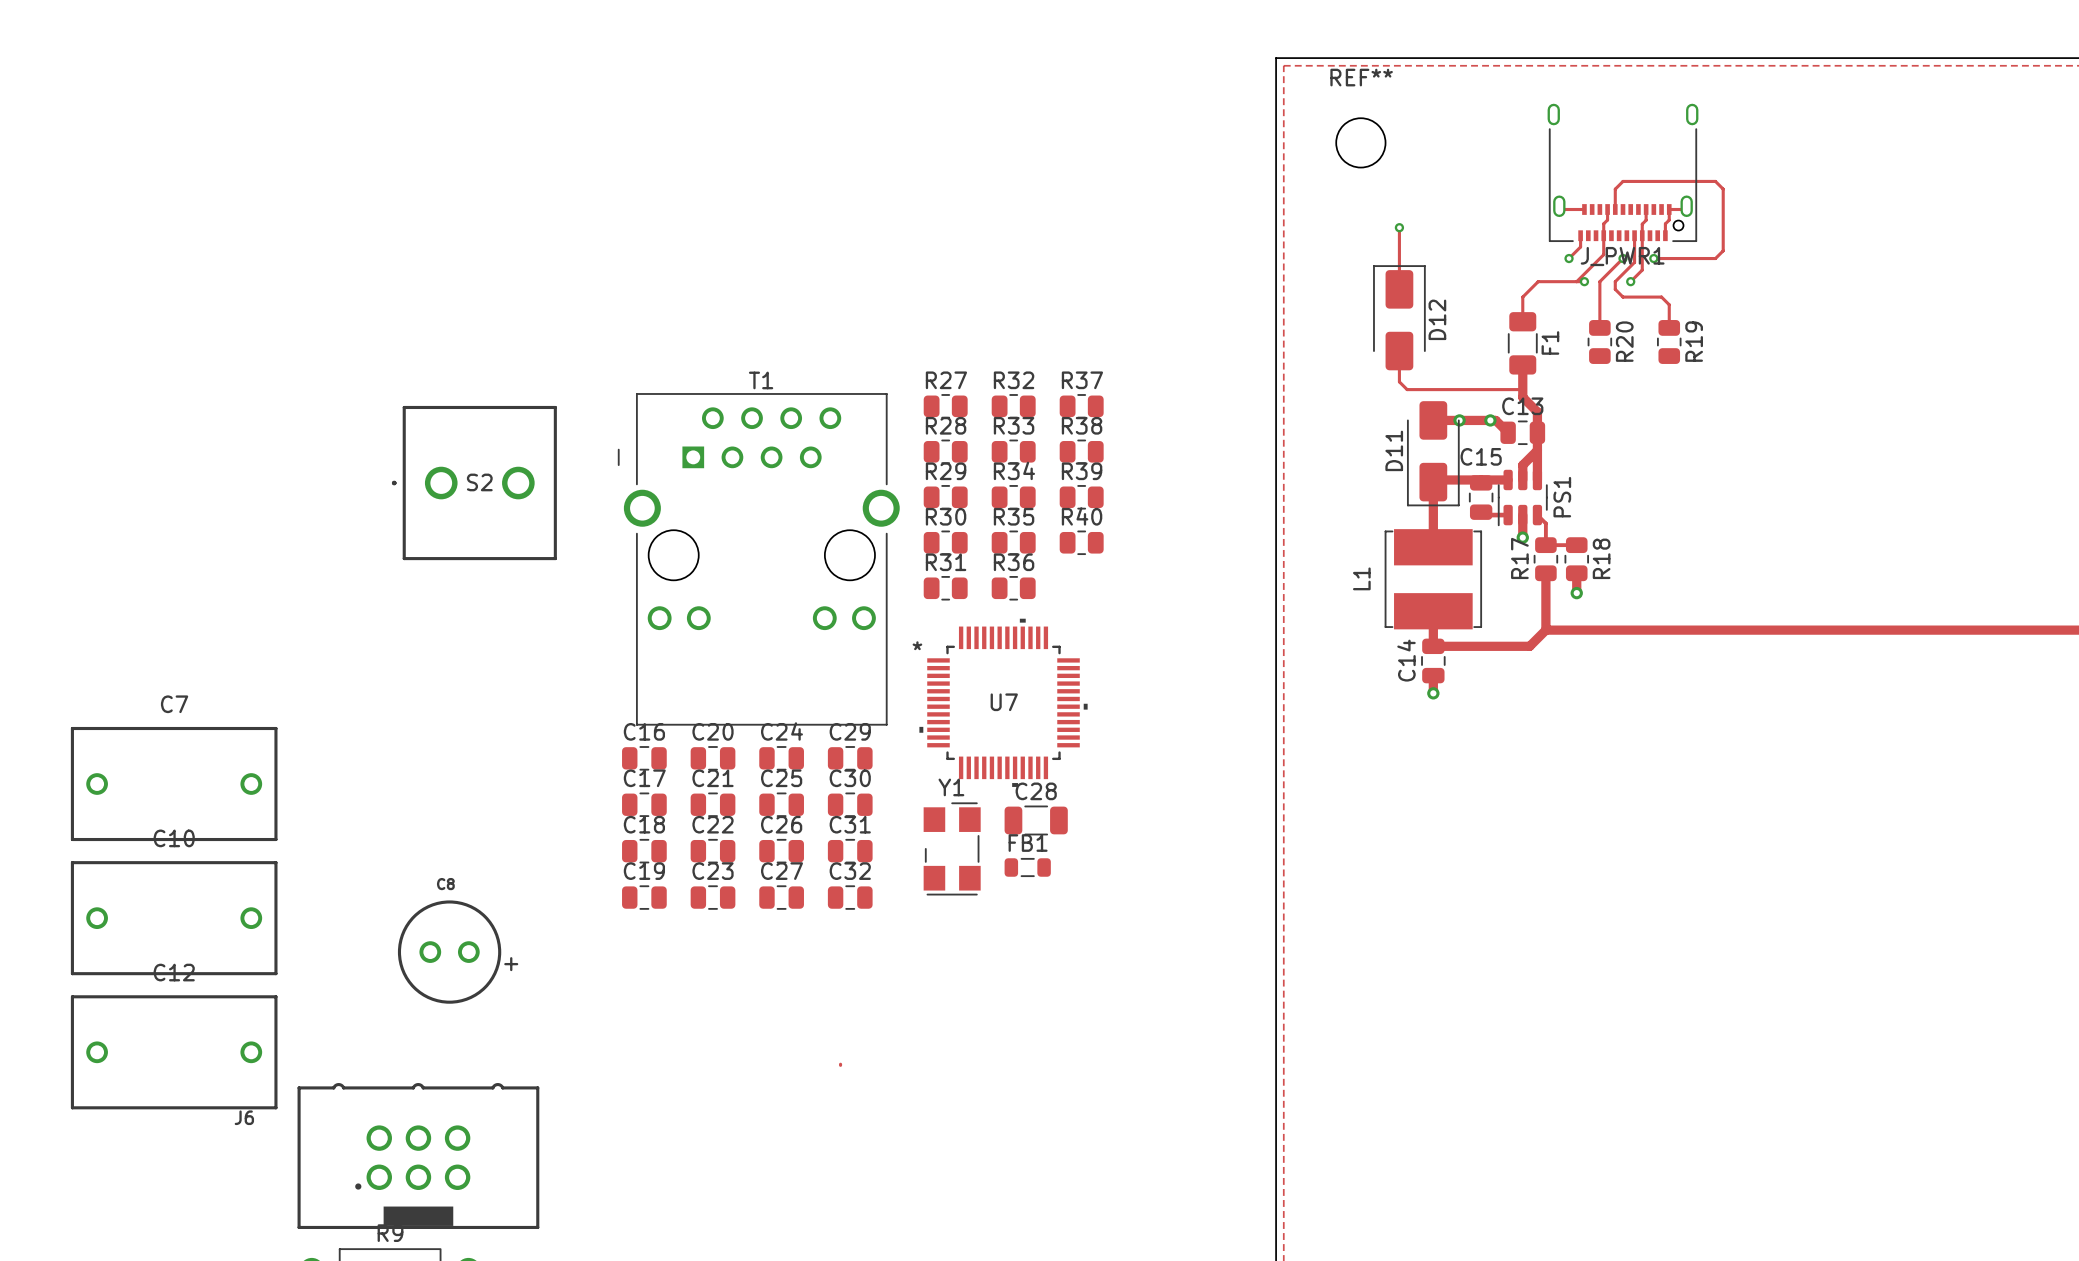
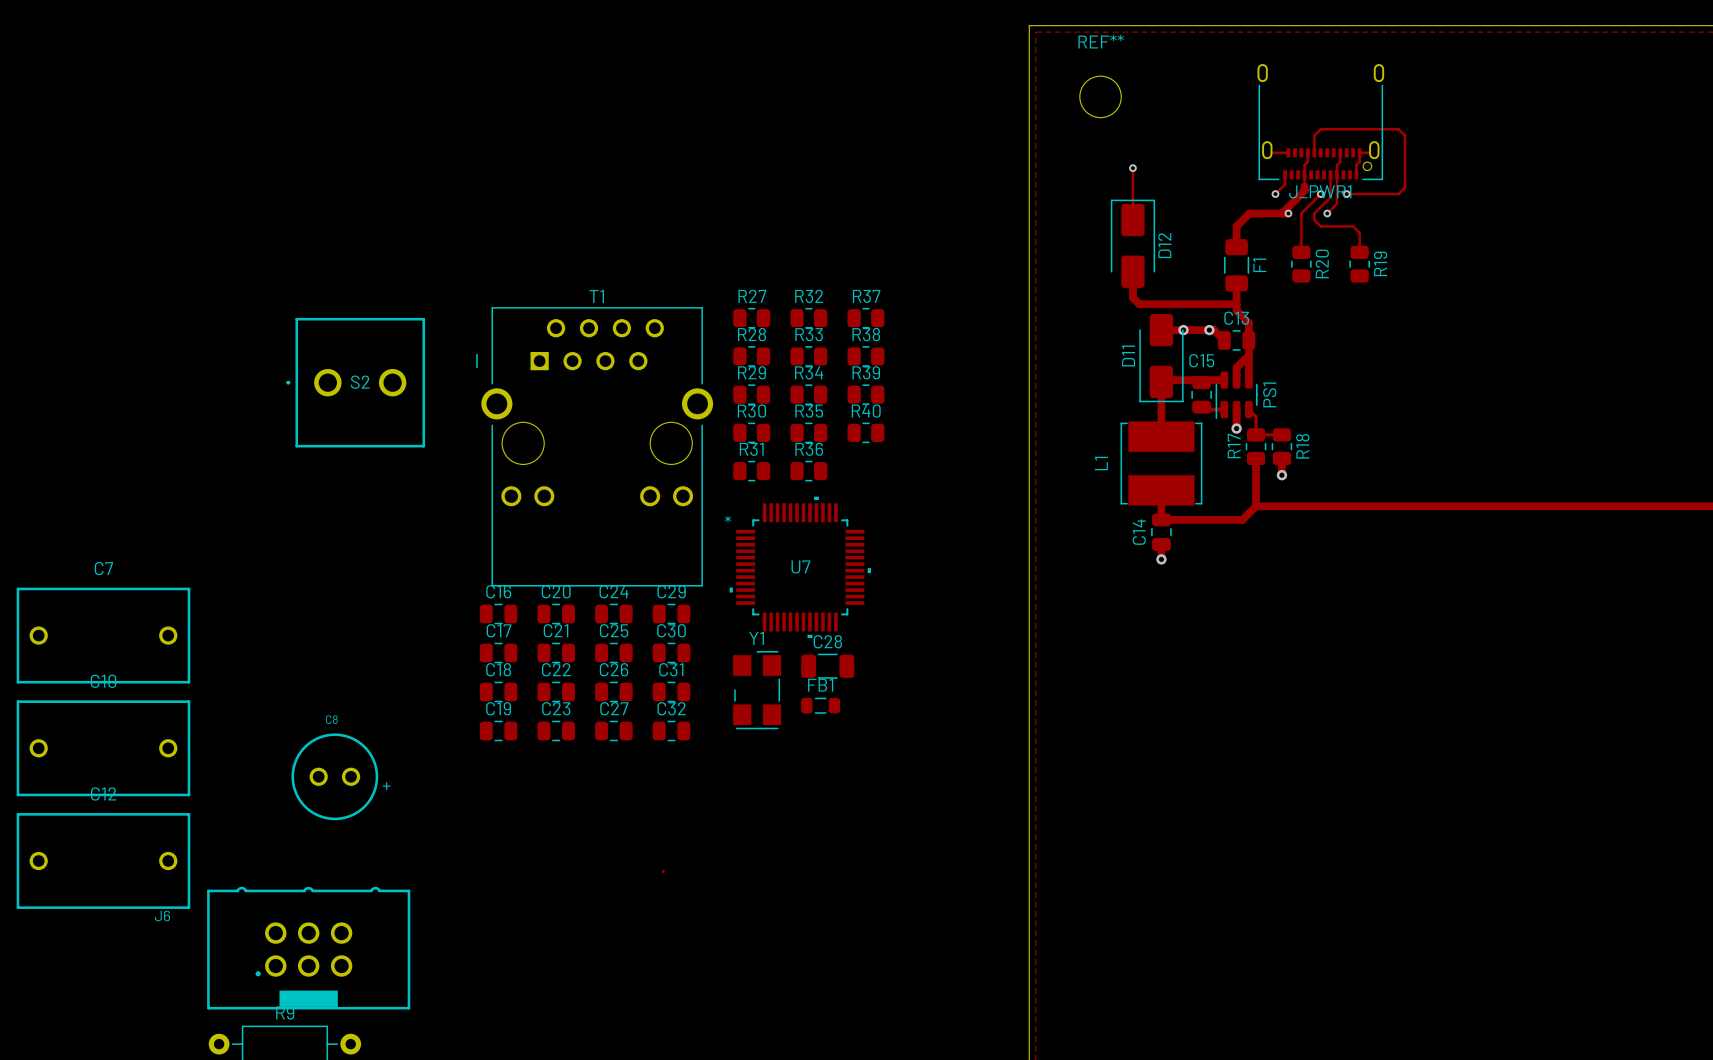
track width: thin (1603, 249) (1603, 254) (1576, 281) -> thick (1304, 186) (1304, 190) (1281, 213)
track width: thin (1584, 281) (1538, 281) (1522, 297) (1522, 321) -> thick (1288, 213) (1249, 213) (1236, 226) (1236, 247)
track width: thin (1399, 351) (1399, 381) (1407, 389) (1522, 389) -> thick (1132, 271) (1132, 297) (1139, 304) (1236, 304)

